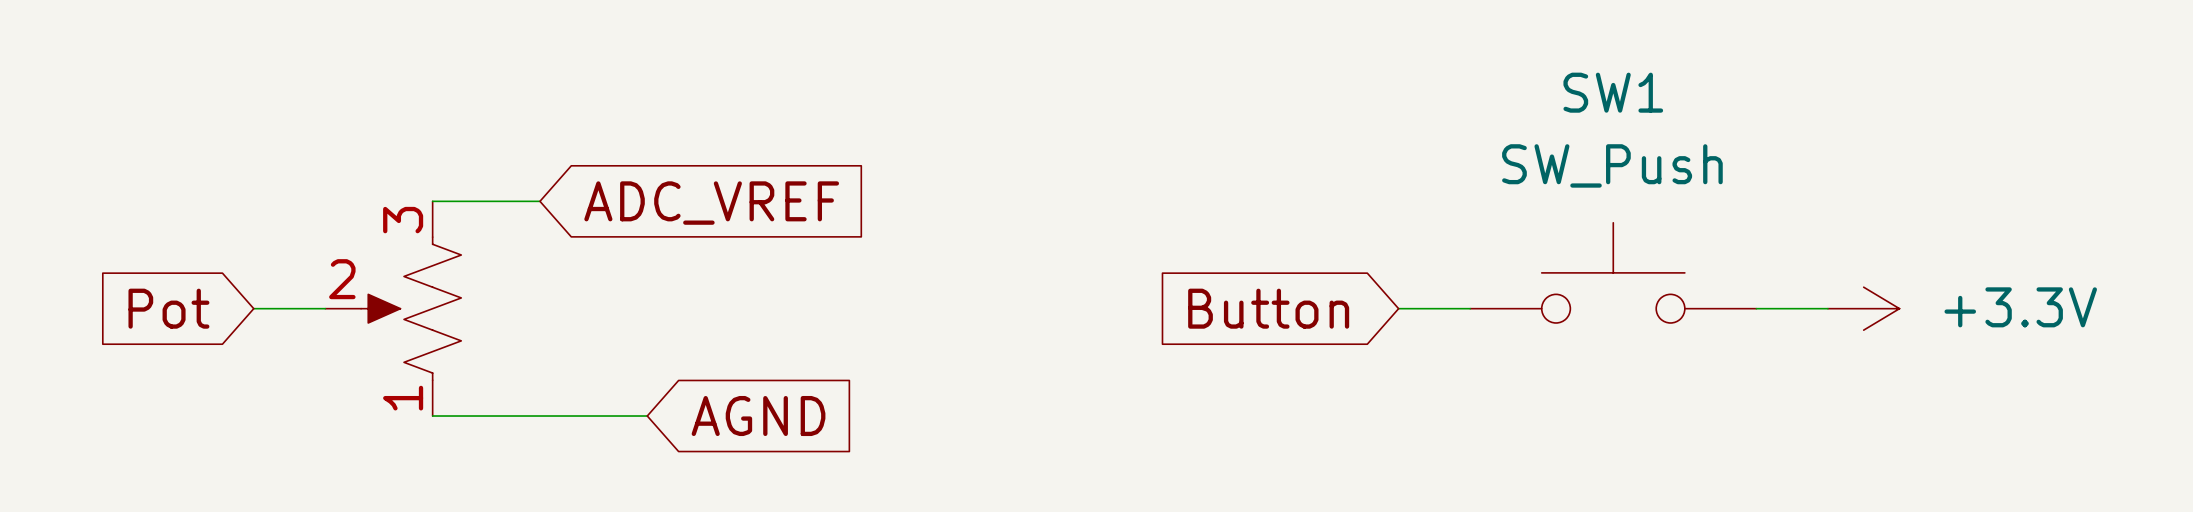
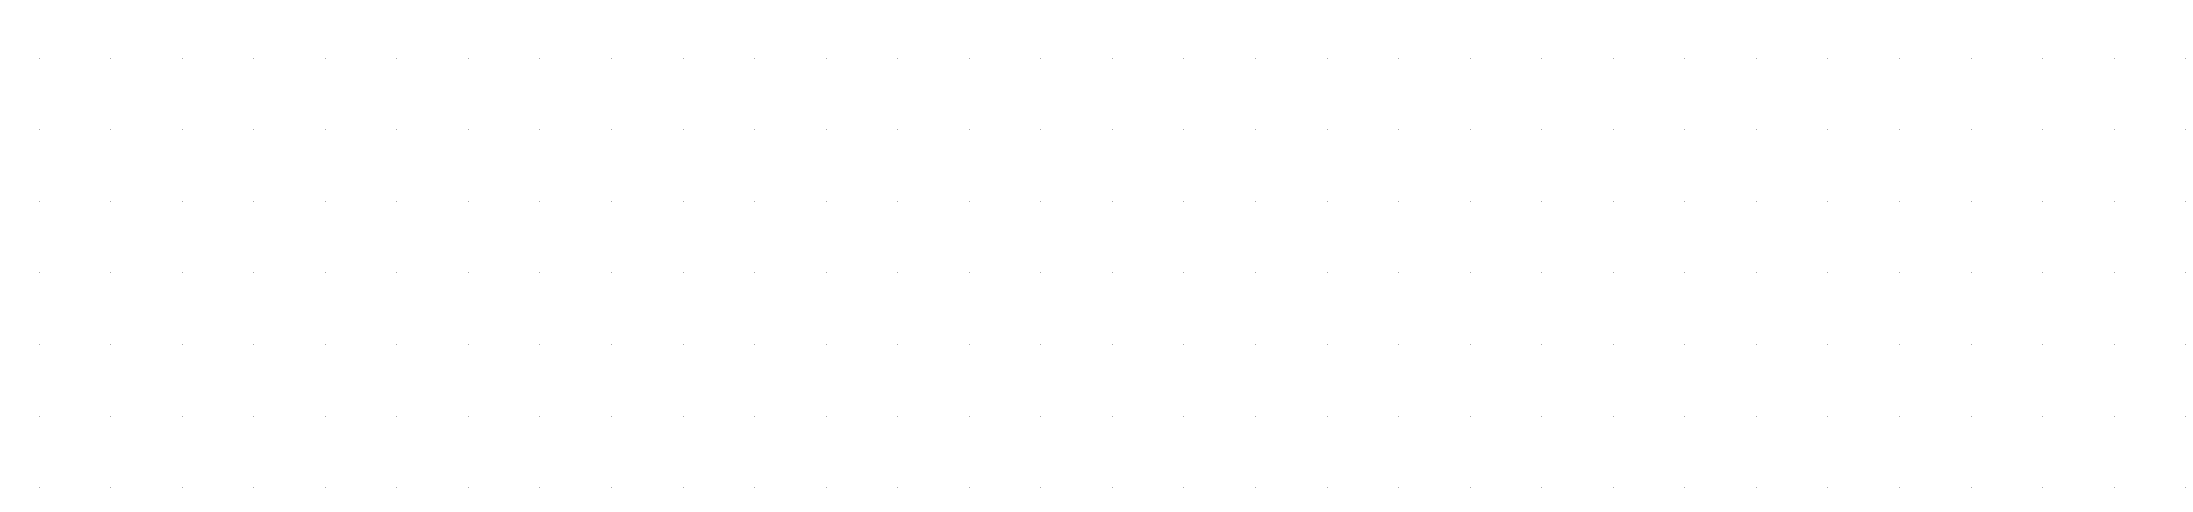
wire: (432, 201) (539, 201) -> none
global label: ADC_VREF (711, 203) -> none
SW1: SW_Push (1613, 272) -> none
global label: Pot (168, 308) -> none
wire: (253, 308) (325, 308) -> none
part: (393, 308) -> none
global label: Button (1268, 308) -> none
wire: (1398, 308) (1470, 308) -> none
wire: (1756, 308) (1827, 308) -> none
power symbol: +3.3V (1863, 308) -> none
wire: (432, 416) (647, 416) -> none
global label: AGND (758, 416) -> none

